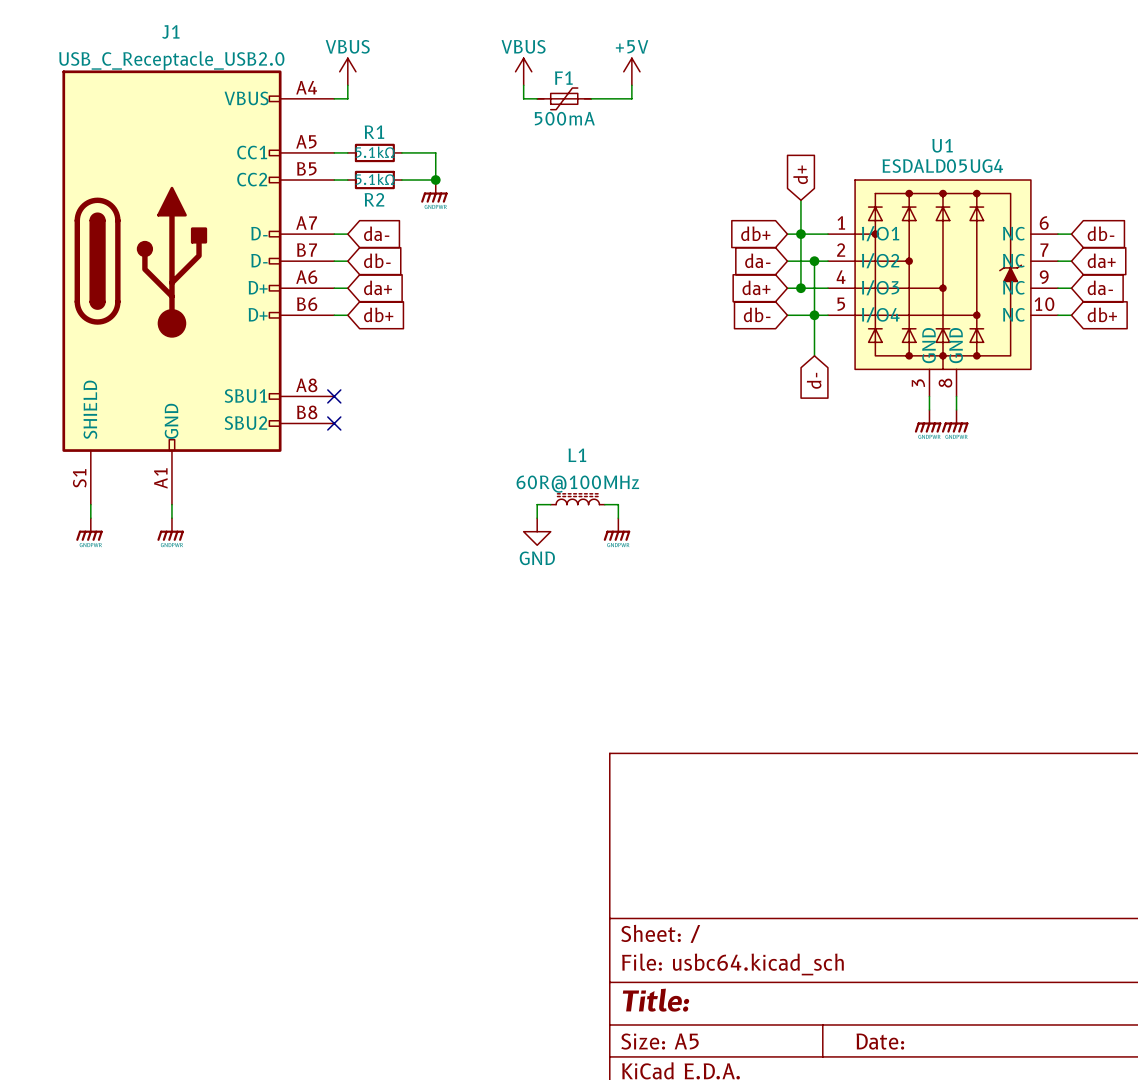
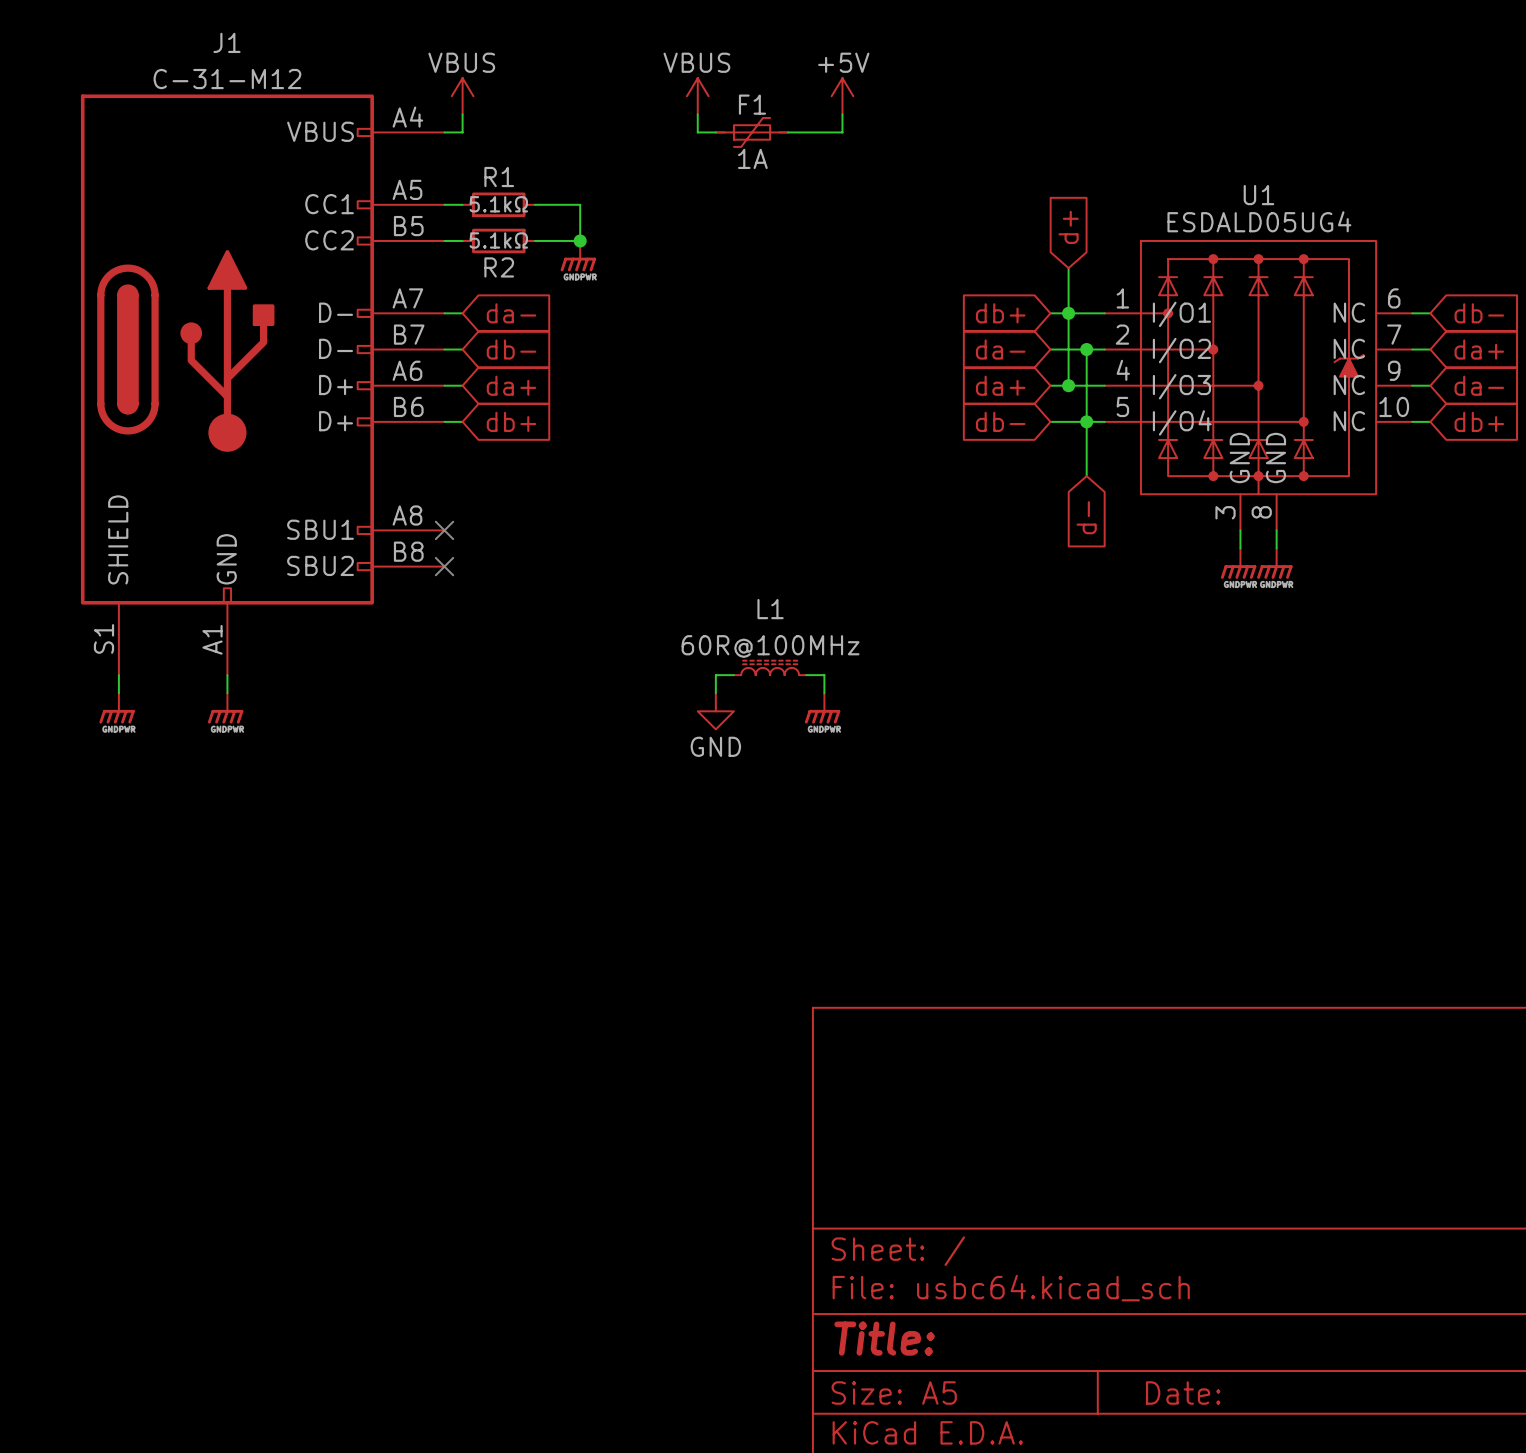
J1 value: USB_C_Receptacle_USB2.0 (171, 60) -> C-31-M12 (227, 79)
F1 value: 500mA (564, 118) -> 1A (752, 158)

